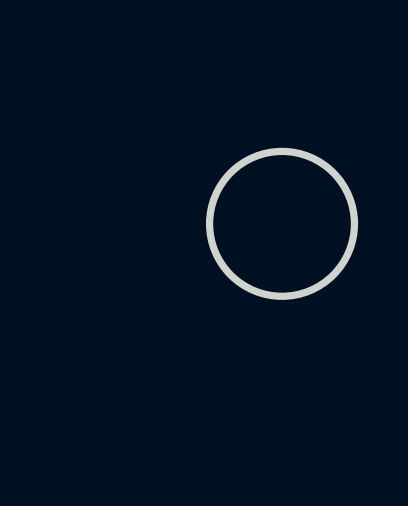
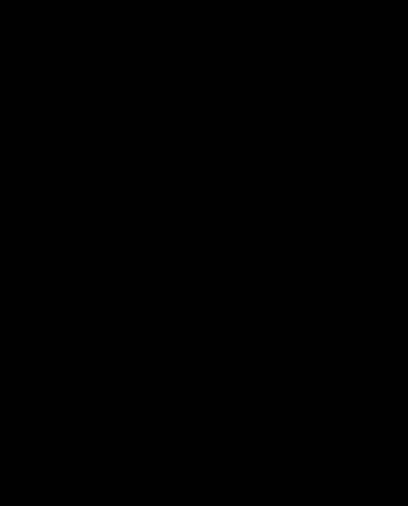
round board edge: [205, 147, 359, 300] -> none

